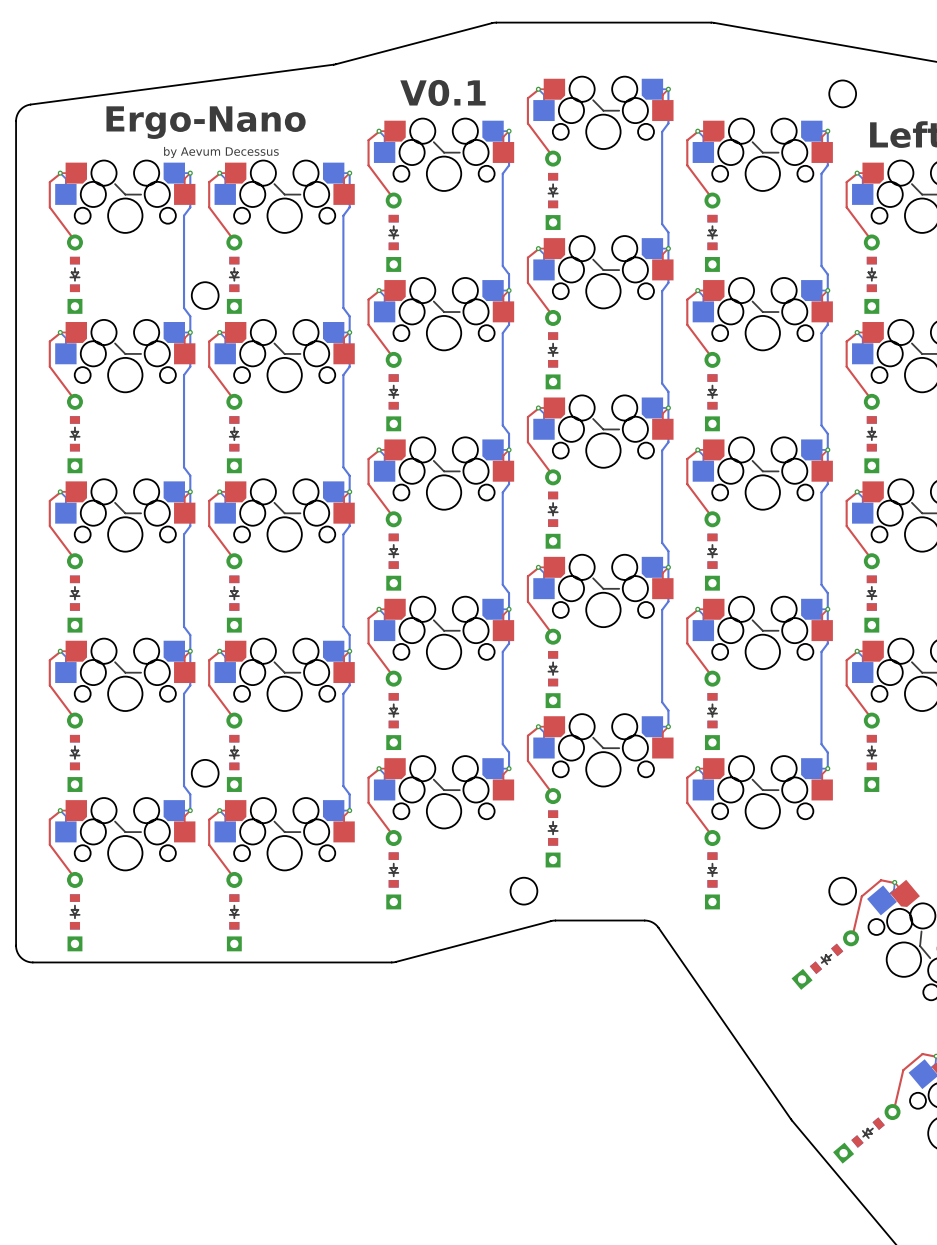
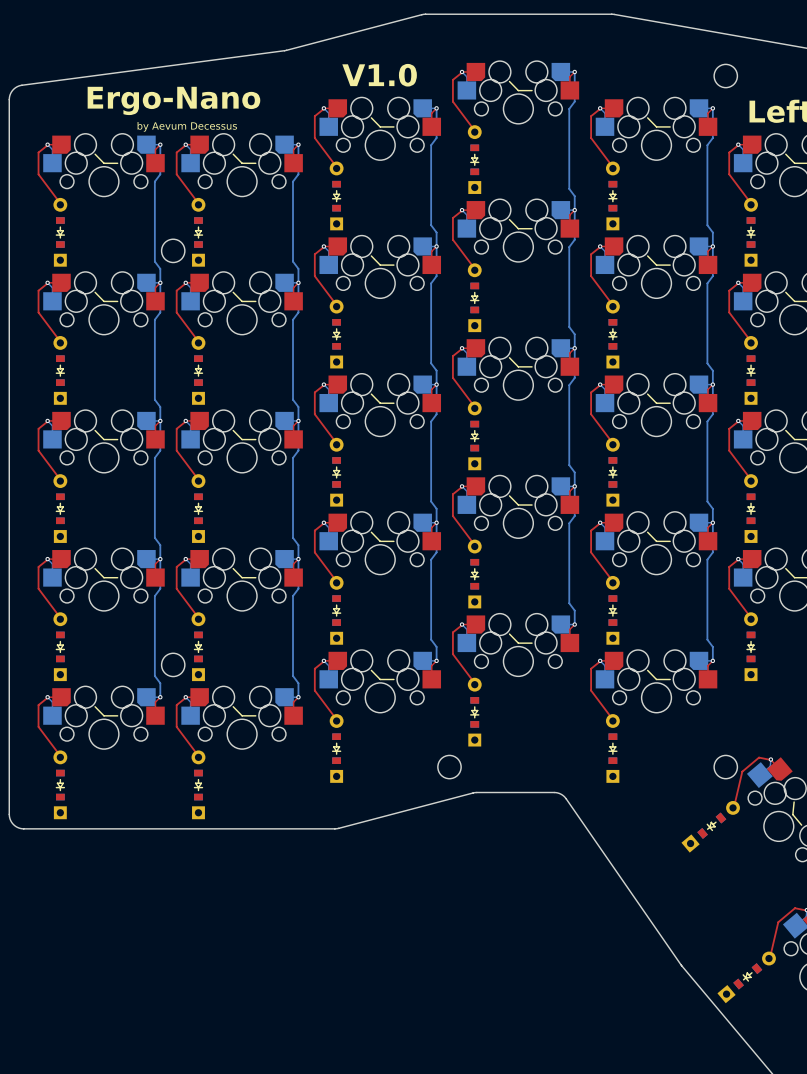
text: V0.1 (442, 92) -> V1.0 (379, 75)

